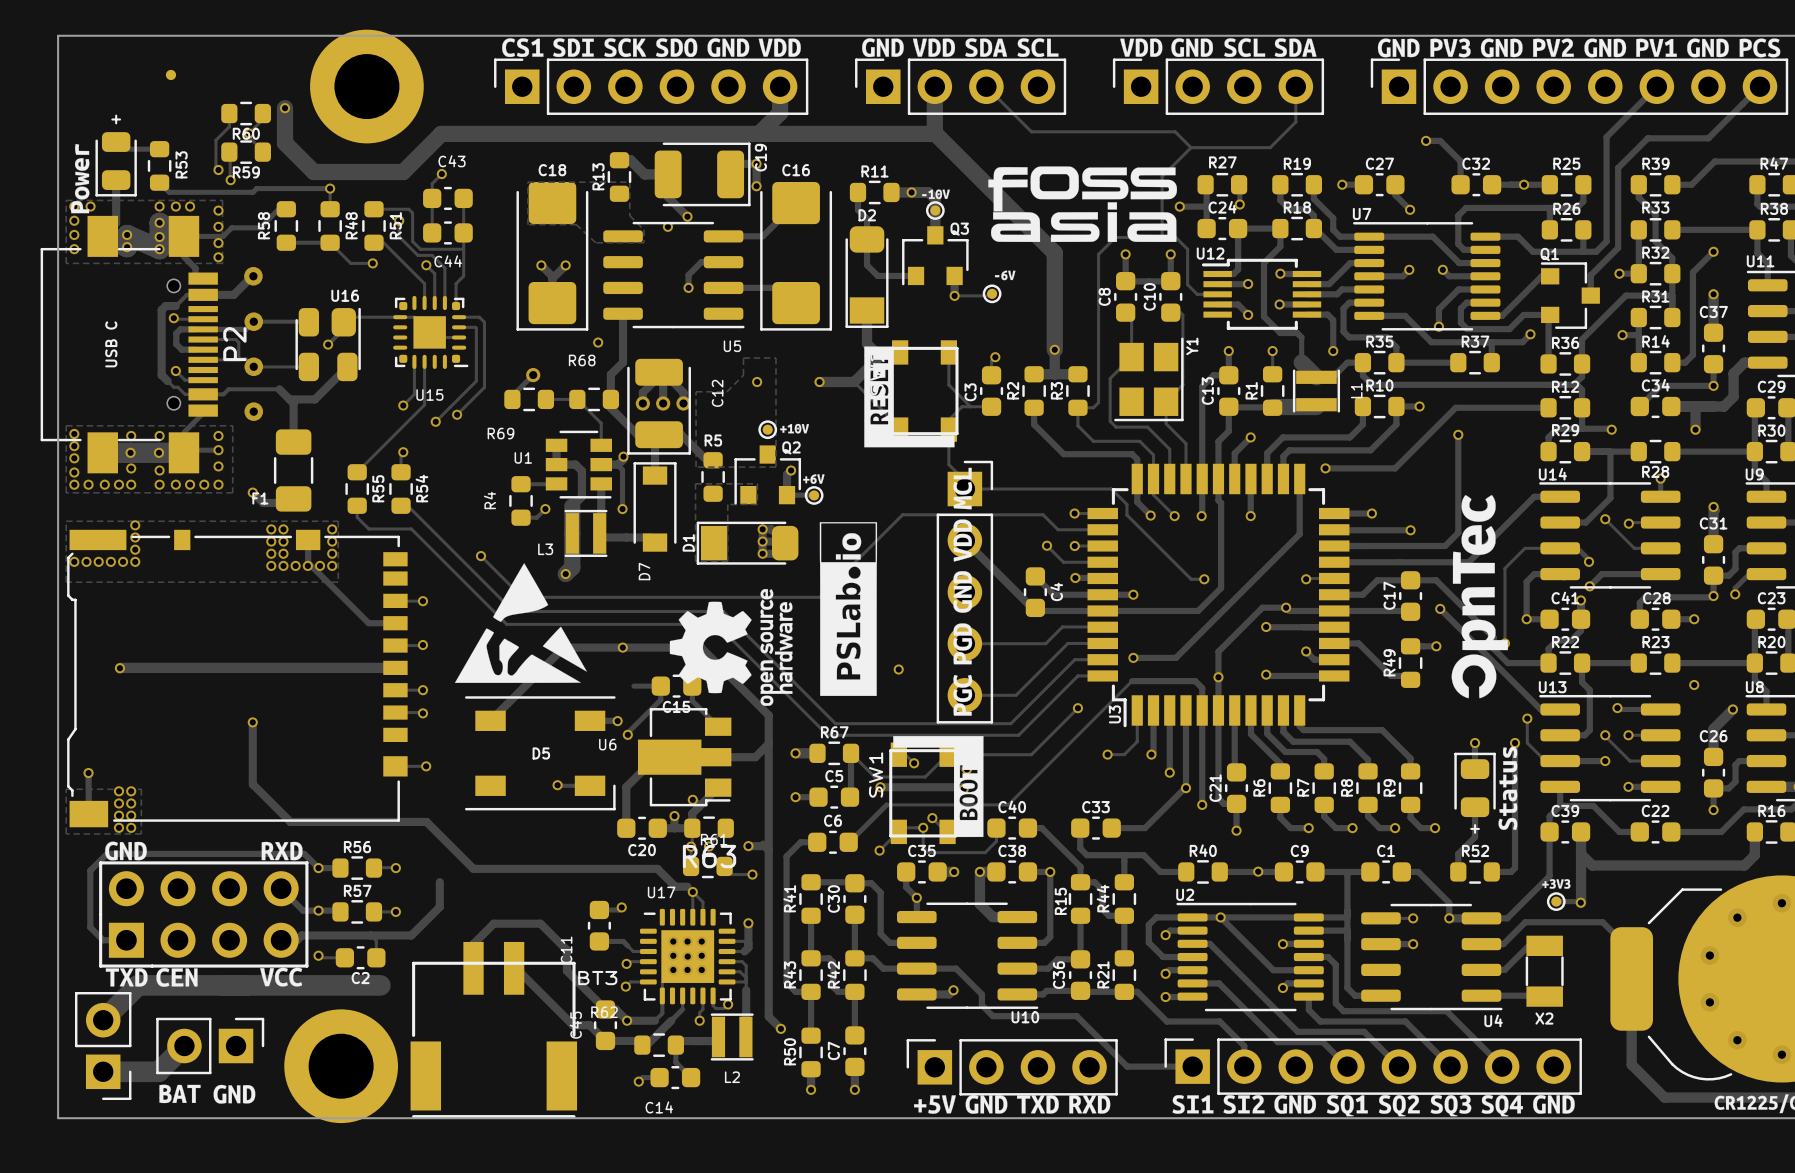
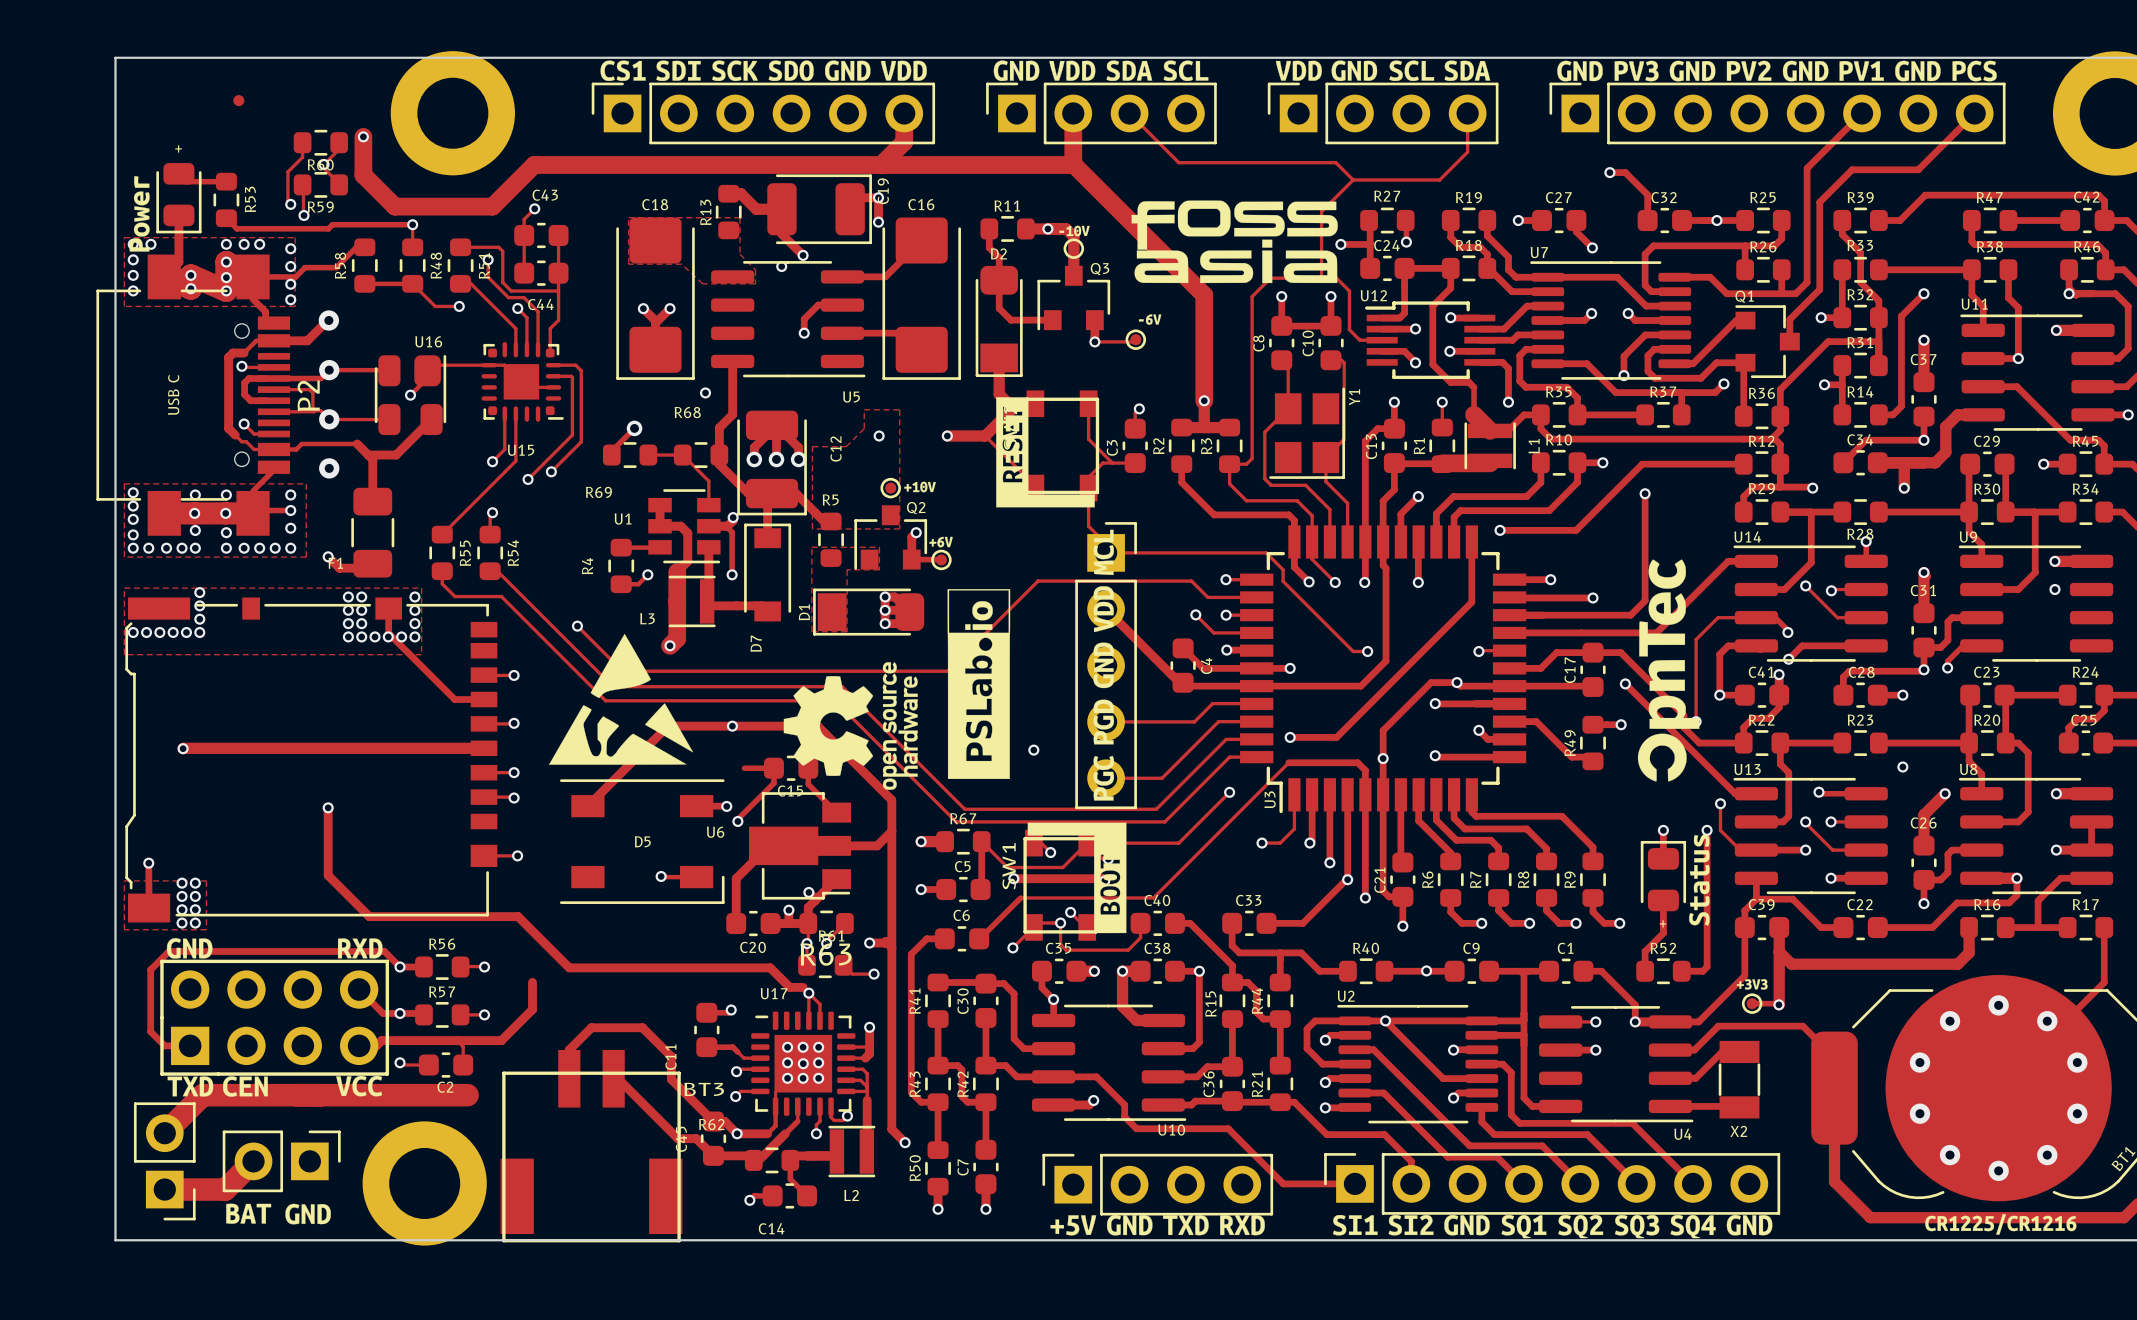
BT3 footprint: [410, 941, 578, 1119] -> [500, 1049, 683, 1243]

